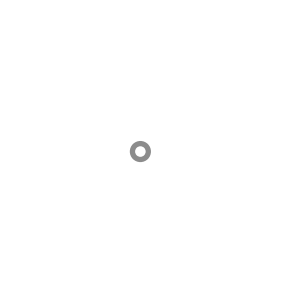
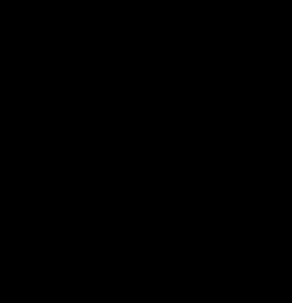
via: (140, 151) -> none

